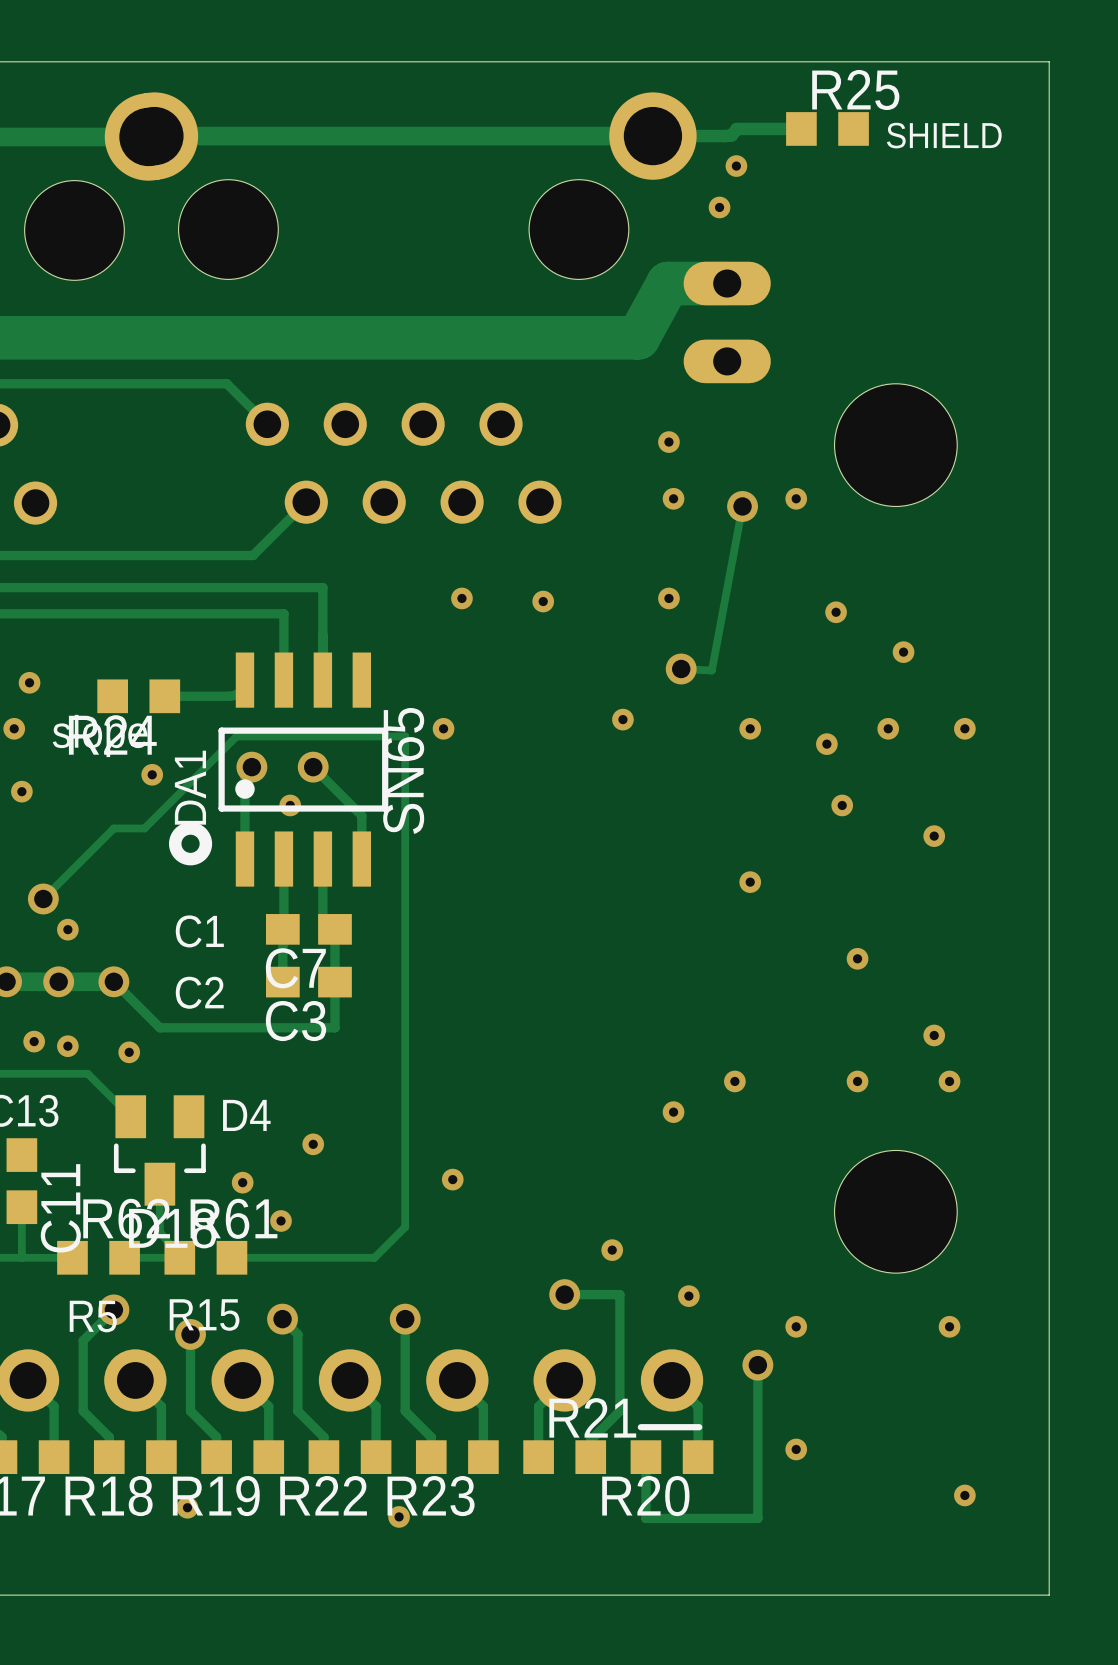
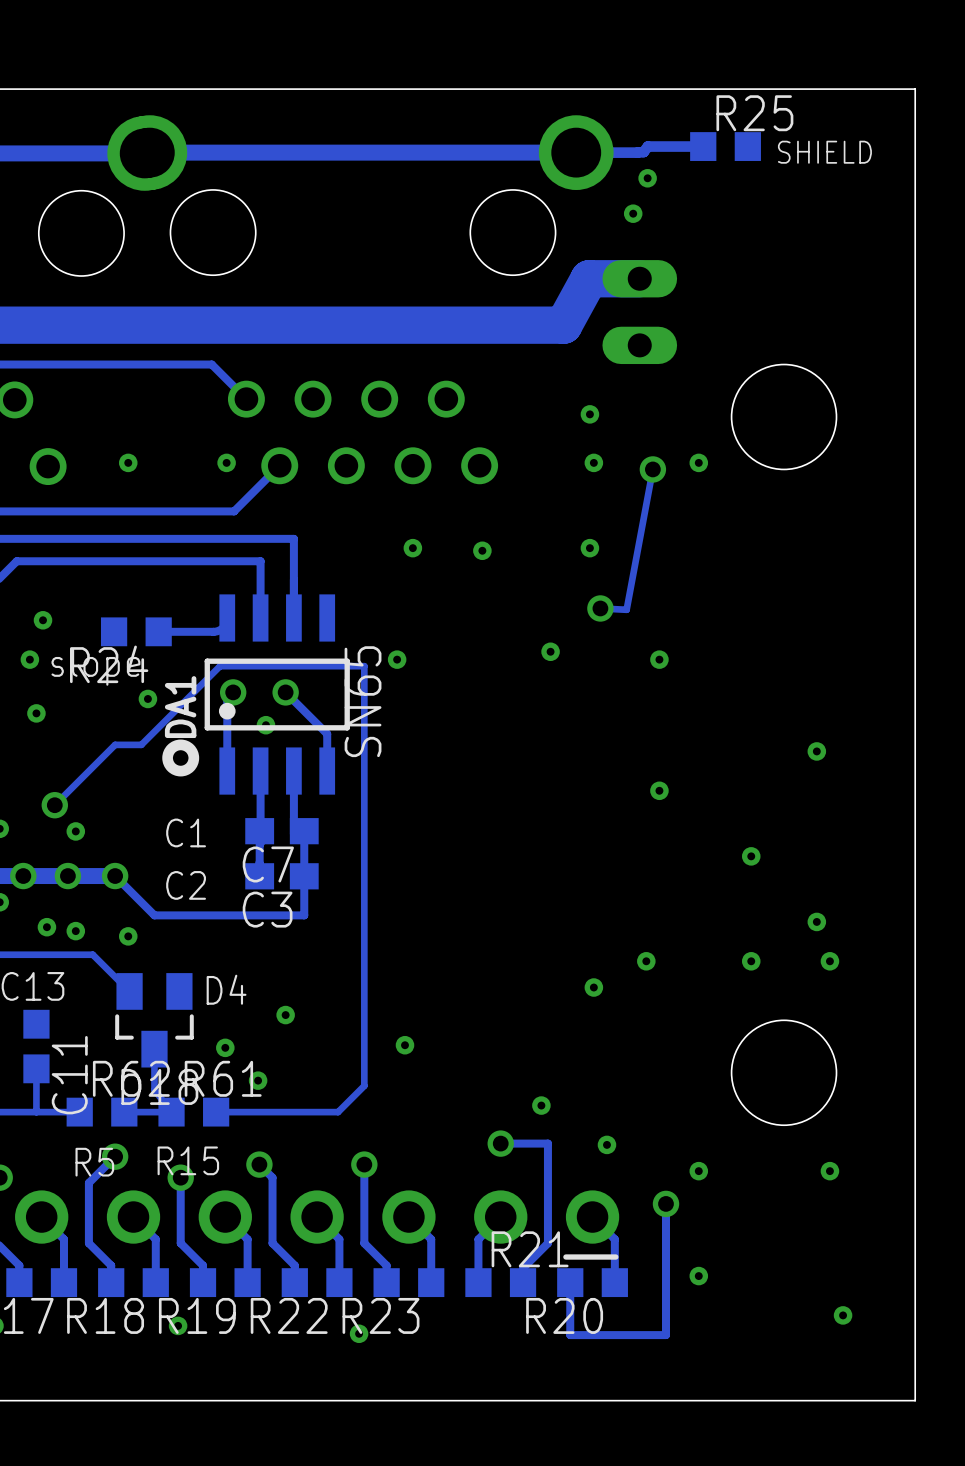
via: none -> (128, 462)
via: none -> (226, 462)
via: (836, 612) -> none
via: (903, 652) -> none
via: (888, 728) -> none
via: (964, 728) -> none
via: (826, 744) -> none
via: (842, 805) -> none

